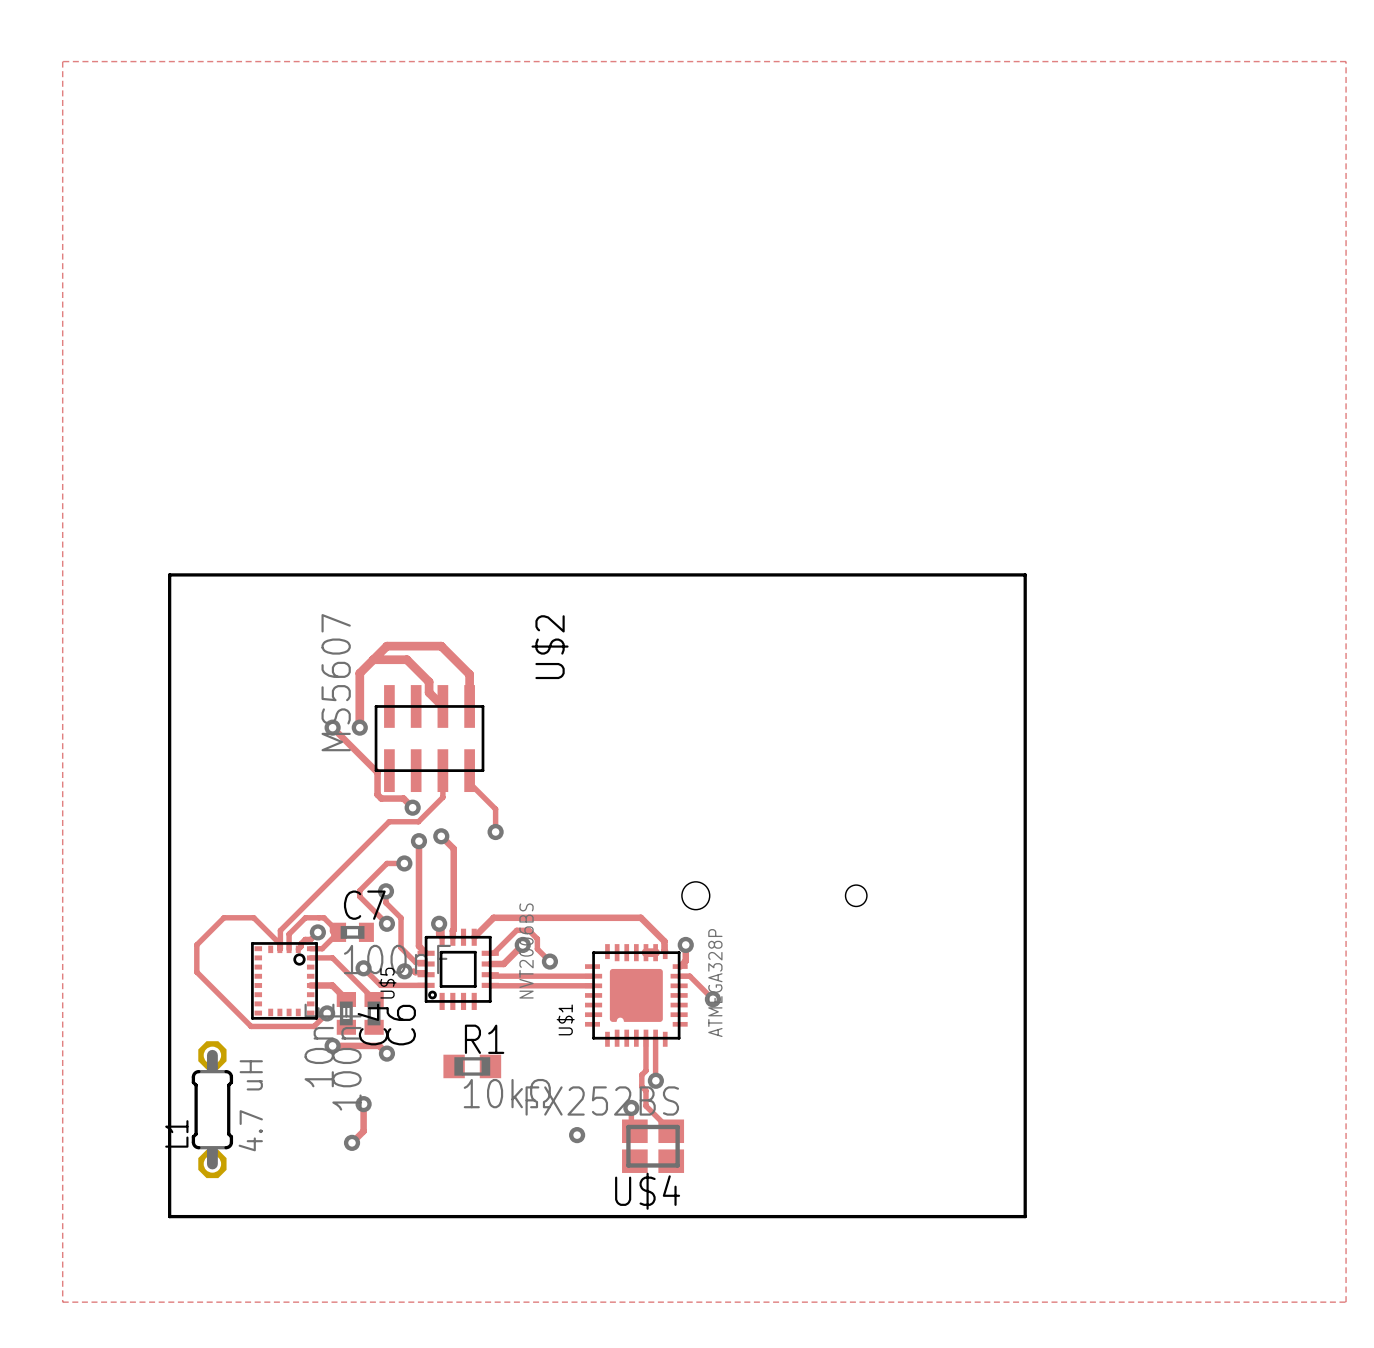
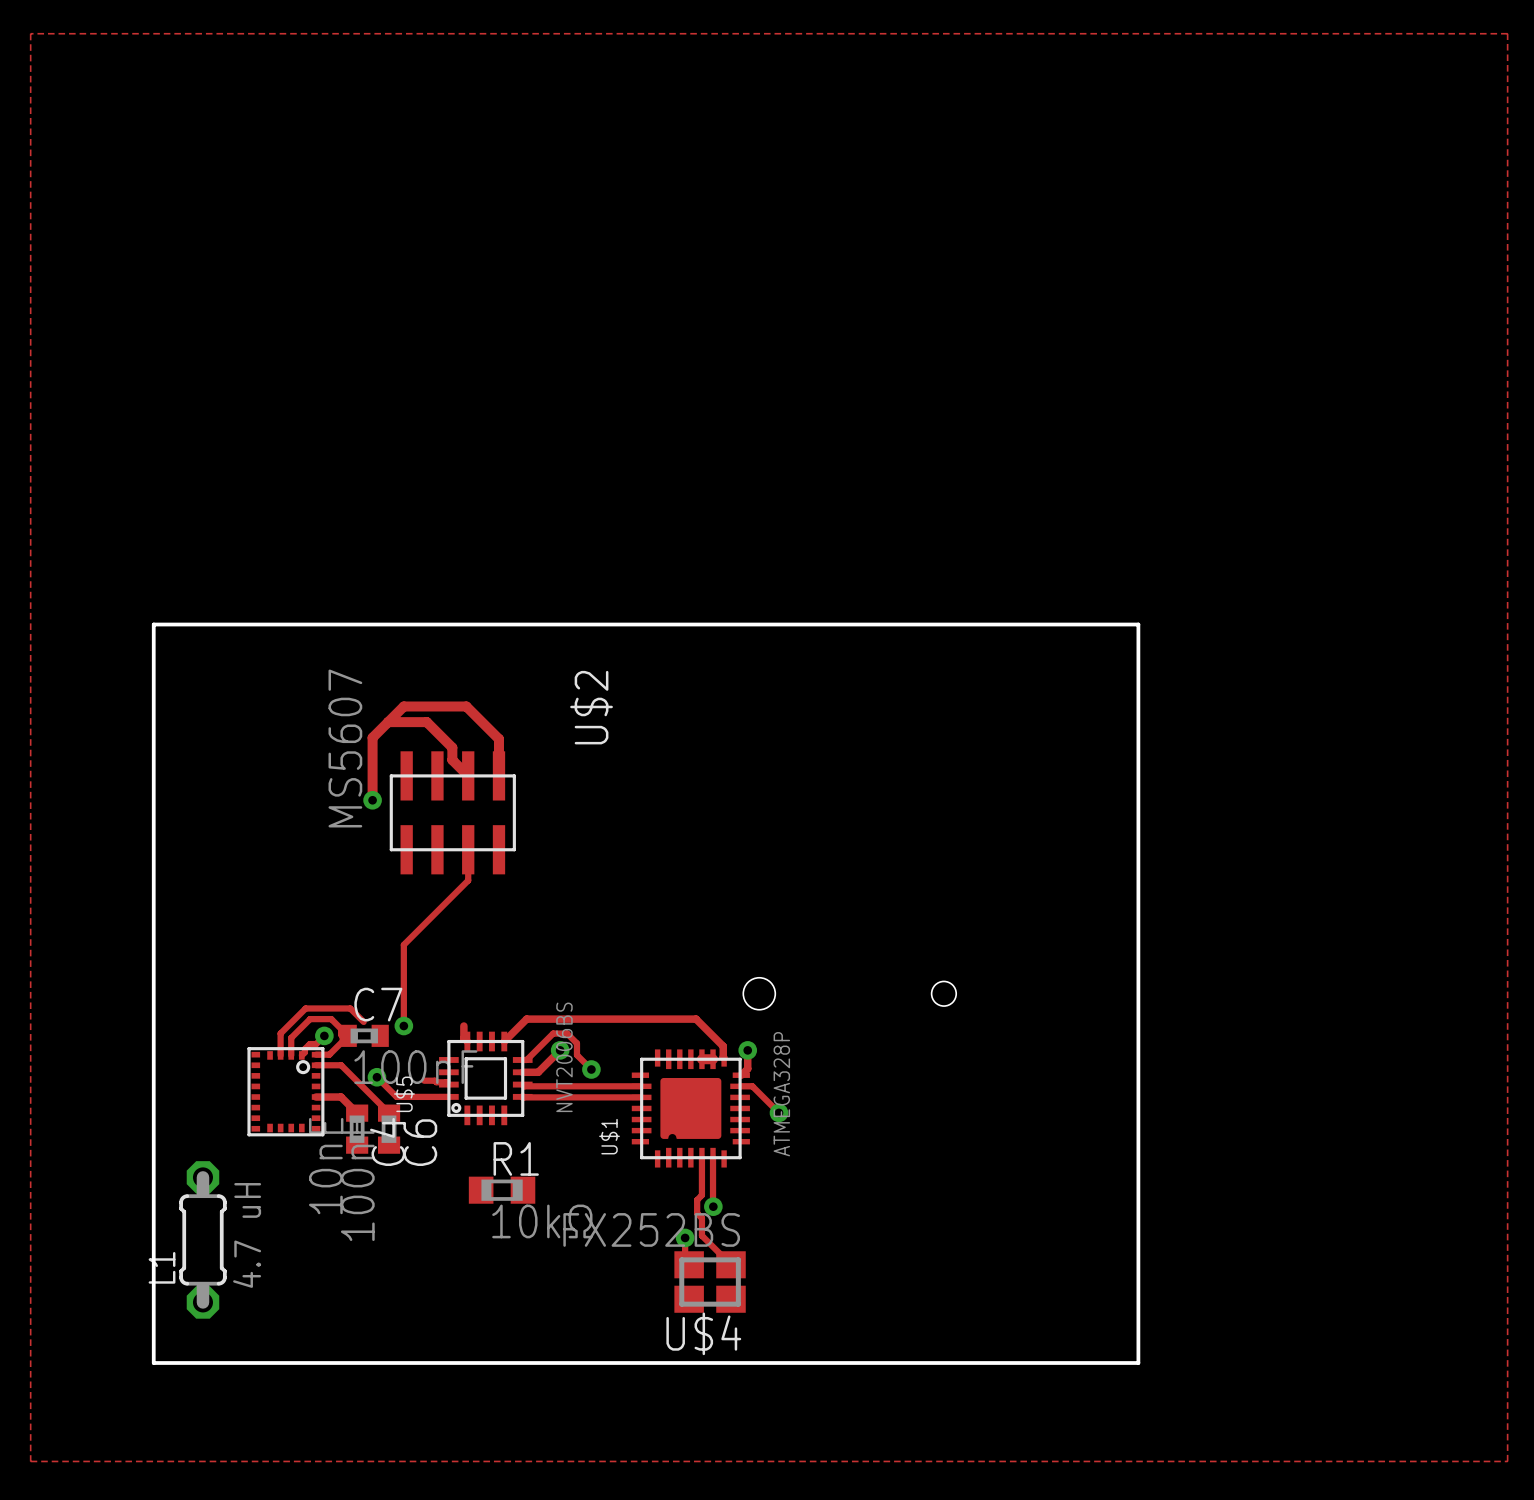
track: (332, 727) (377, 772) (377, 794) (381, 798) (403, 798) (412, 807) -> none
via: (332, 727) -> none
track: (469, 770) (469, 783) (495, 809) (495, 832) -> none
via: (412, 807) -> none
track: (418, 821) (389, 821) (280, 930) (279, 949) (279, 943) (253, 917) (223, 917) (196, 944) (196, 972) (251, 1026) (314, 1026) (327, 1013) -> none
via: (495, 832) -> none
track: (441, 836) (453, 848) (452, 937) -> none
via: (441, 836) -> none
track: (418, 841) (418, 946) (426, 953) -> none
via: (418, 841) -> none
track: (404, 863) (386, 863) (359, 890) (359, 896) (386, 923) -> (440, 908) (403, 944) (403, 1026)
via: (404, 863) -> none
track: (385, 891) (385, 902) (401, 917) (401, 947) (415, 962) (426, 963) -> none
via: (385, 891) -> none
track: none -> (363, 1021) (350, 1008) (305, 1008) (280, 1033) (280, 1055)
via: (439, 923) -> none
via: (404, 971) -> none
via: (327, 1013) -> none
track: (332, 1045) (379, 1045) (386, 1053) -> none
via: (332, 1045) -> none
via: (386, 1053) -> none
track: (363, 1104) (363, 1131) (352, 1142) -> none
via: (363, 1104) -> none
via: (577, 1135) -> none
via: (352, 1142) -> none

